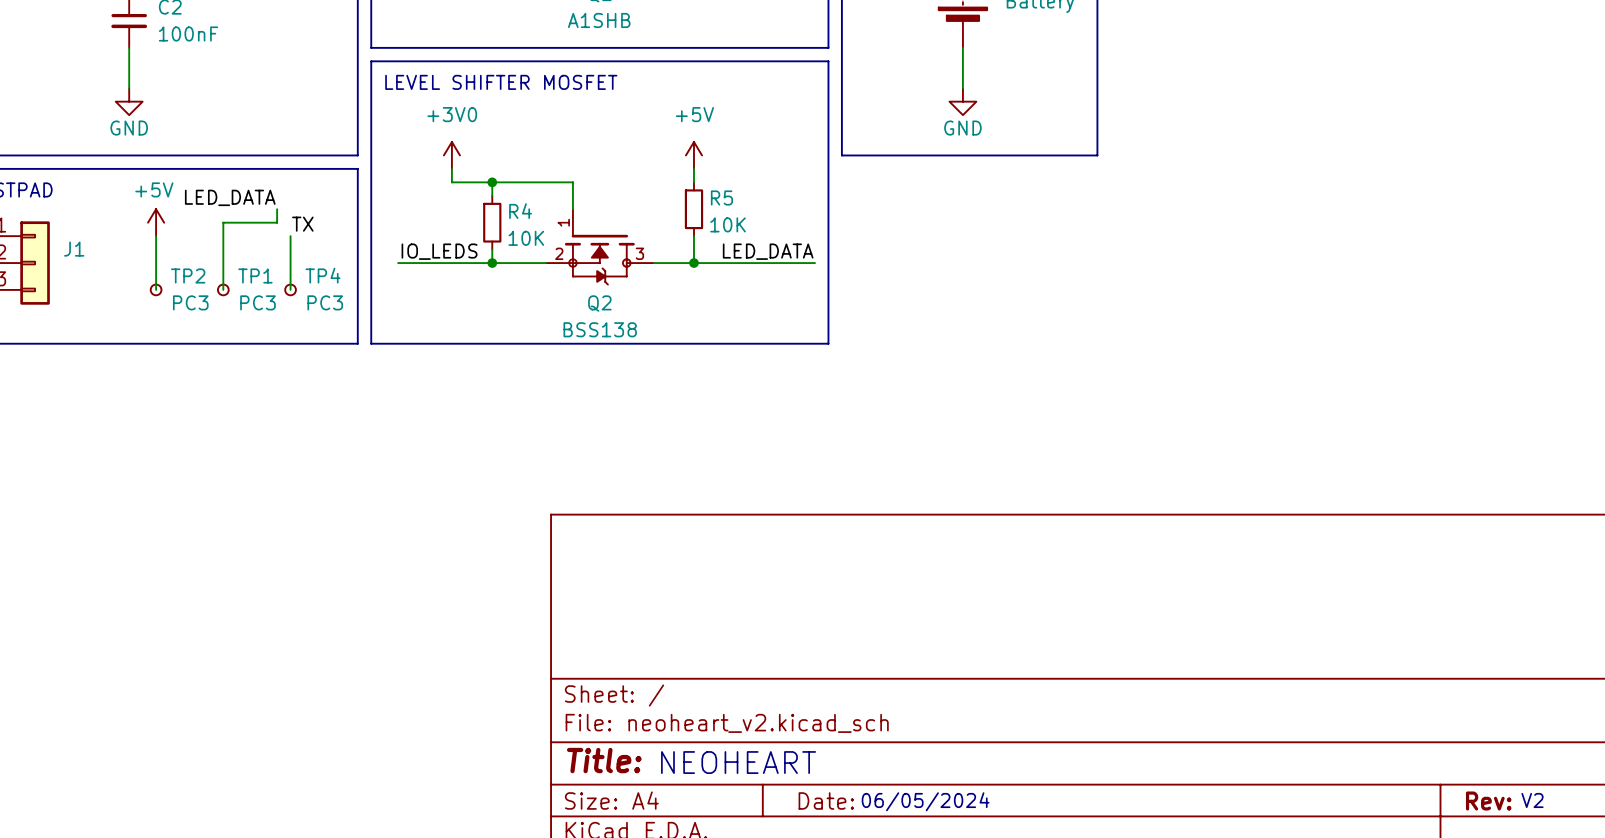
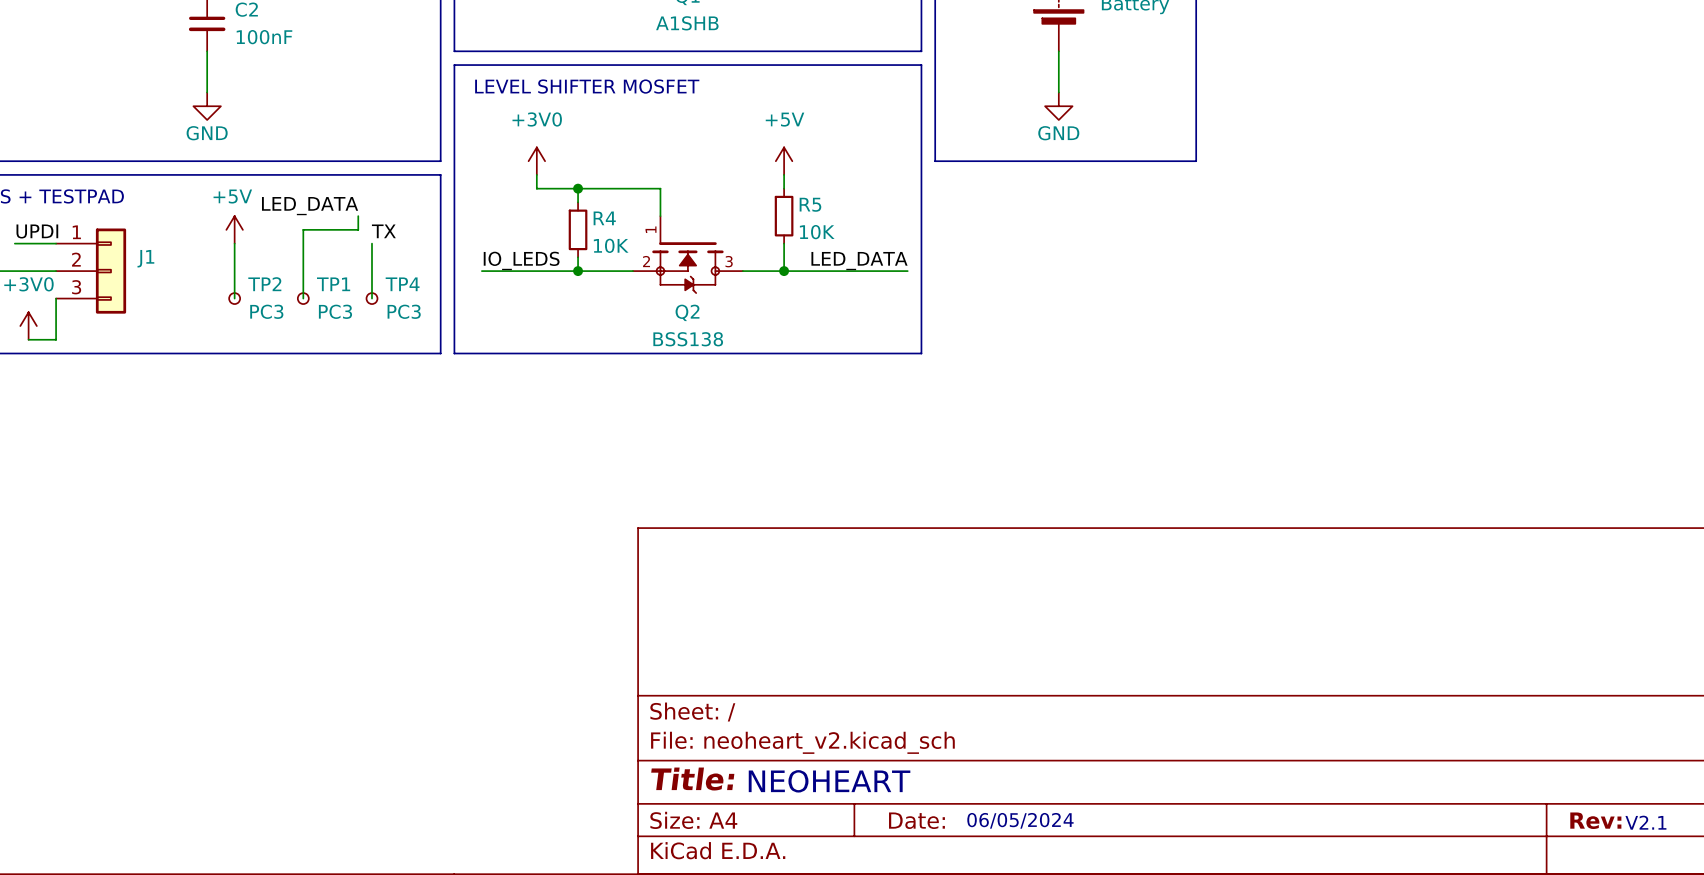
text: V2 (1532, 800) -> V2.1 (1645, 822)

